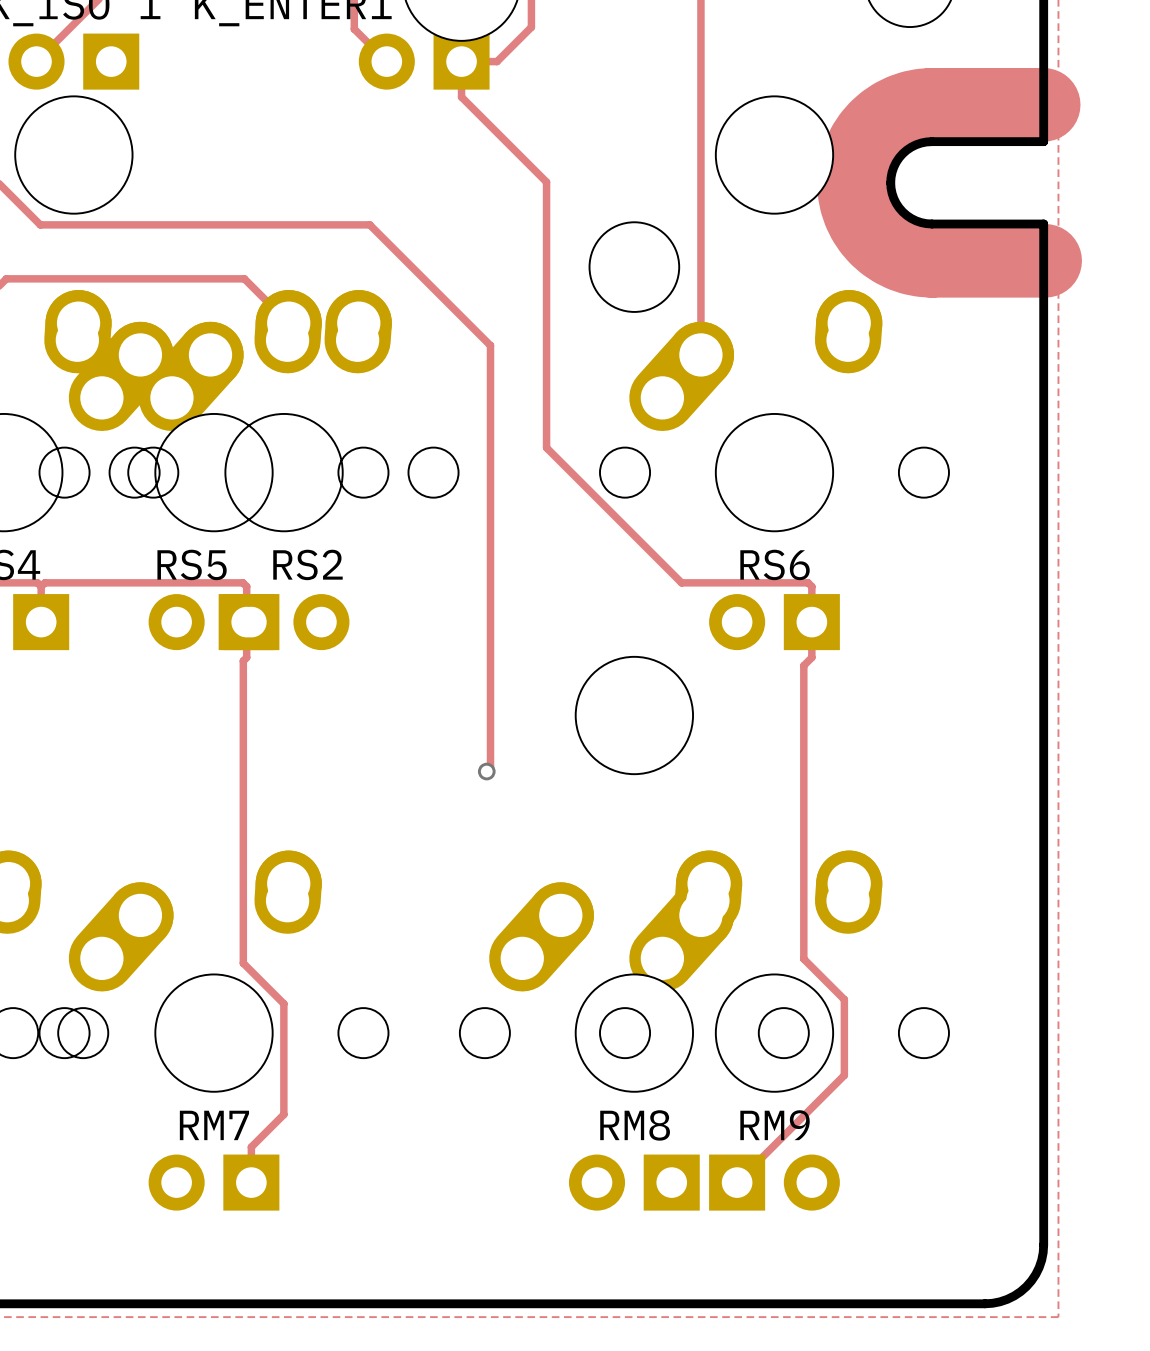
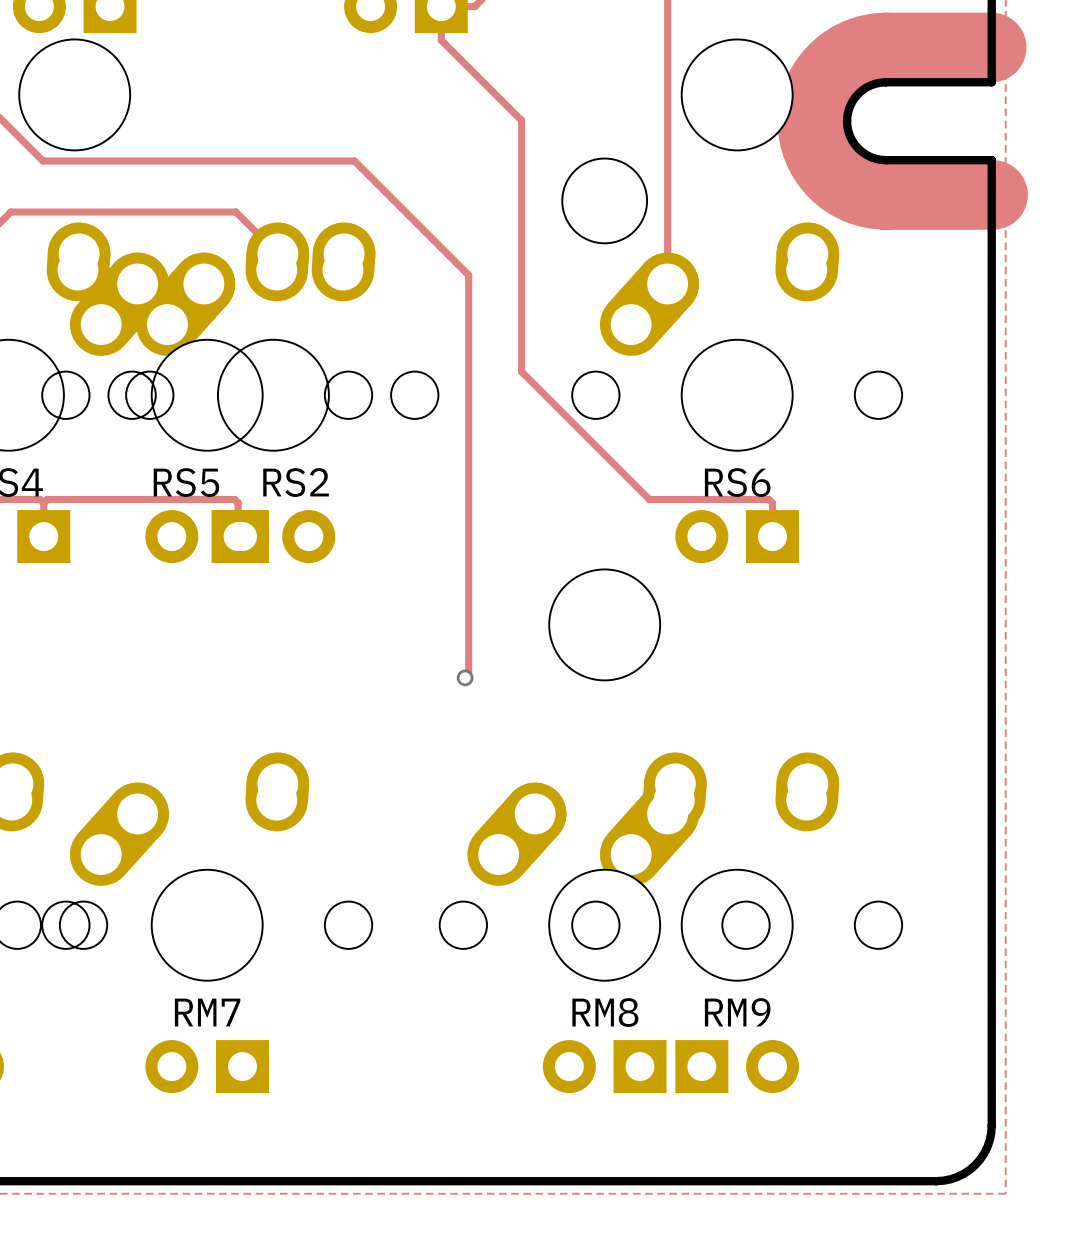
track: (246, 622) (246, 657) (243, 660) (243, 963) (283, 1003) (283, 1114) (251, 1147) (251, 1182) -> none
track: (811, 622) (811, 657) (803, 665) (803, 959) (844, 999) (844, 1075) (737, 1182) -> none

